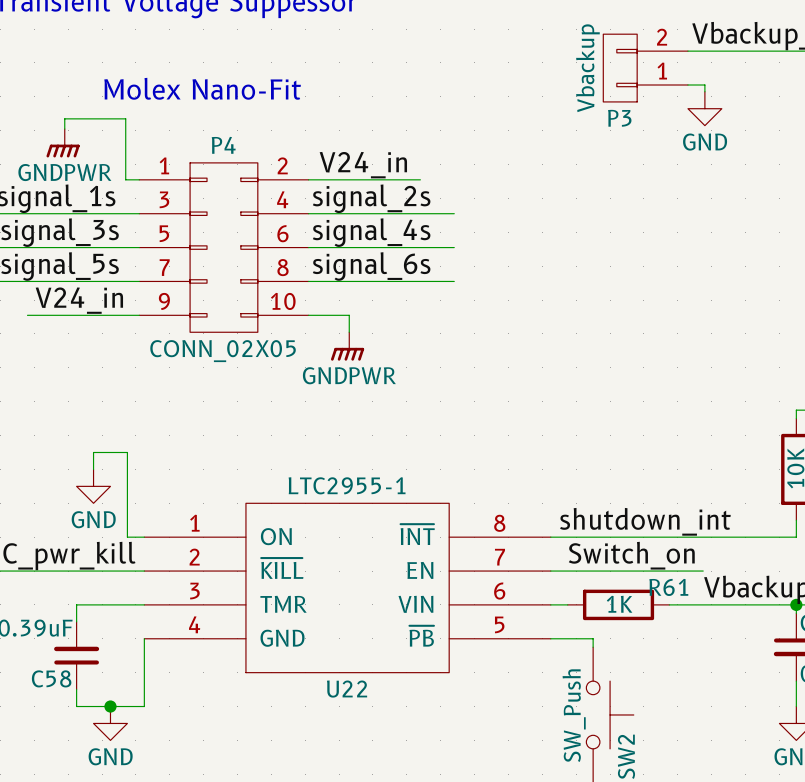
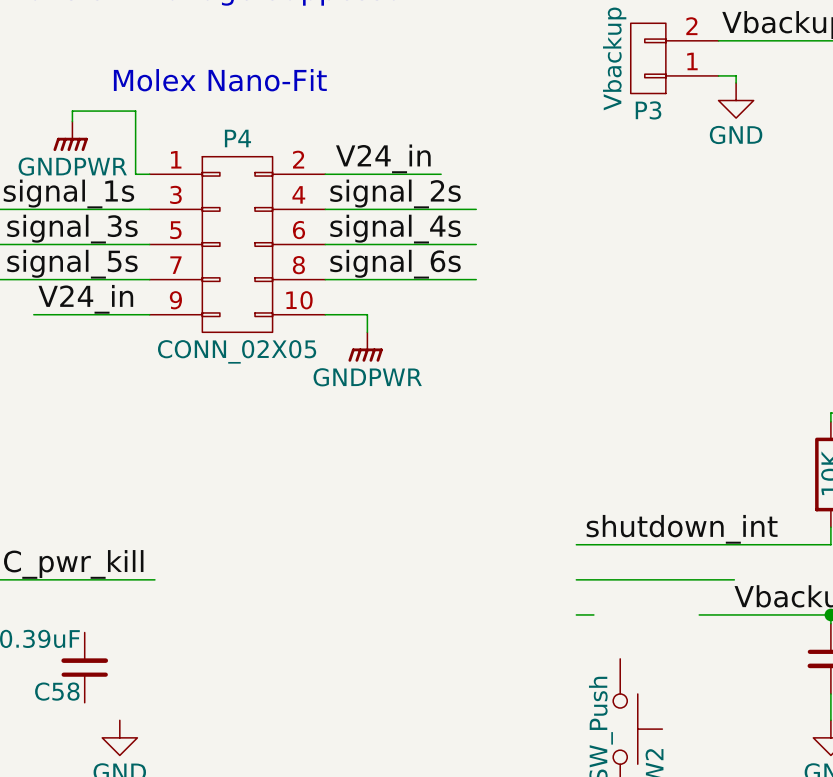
wire: (93, 469) (93, 452) (127, 452) (127, 537) (144, 537) -> none
power symbol: GND (93, 486) -> none
label: Switch_on (631, 555) -> none
U22: LTC2955-1 (347, 587) -> none
wire: (144, 604) (76, 604) (76, 621) -> none
R61: 1K (618, 604) -> none
wire: (144, 638) (144, 706) (76, 706) (76, 689) -> none
wire: (550, 638) (593, 638) (593, 647) -> none
junction: (110, 706) -> none

